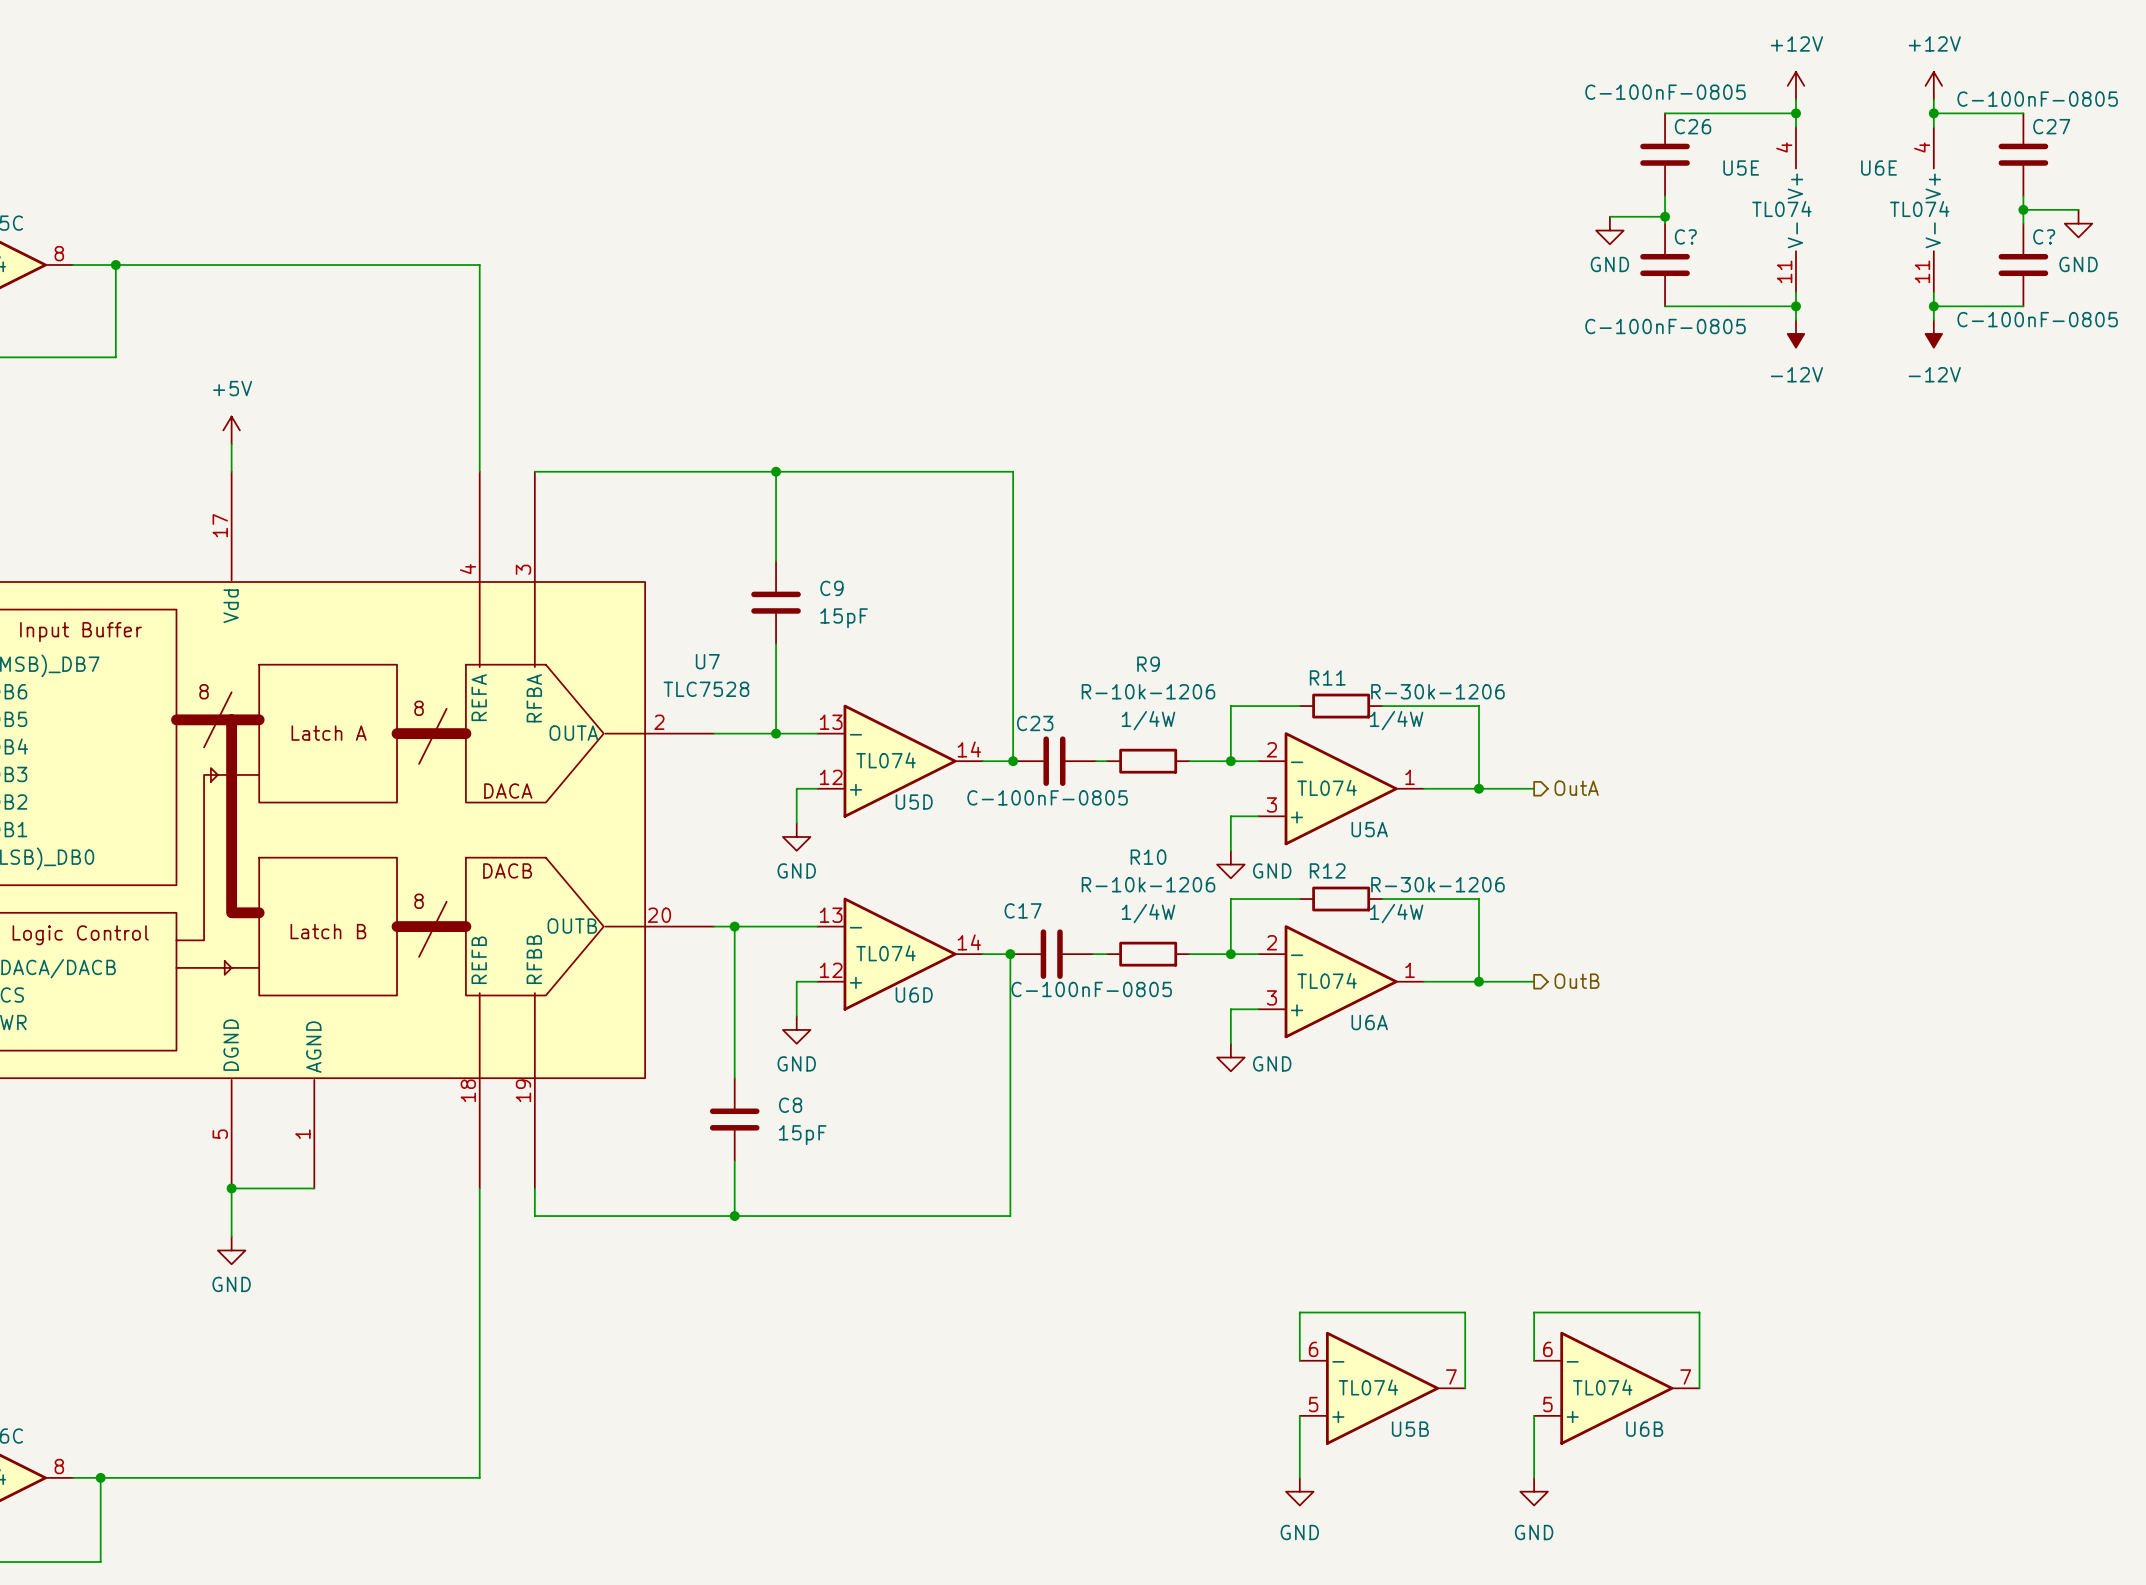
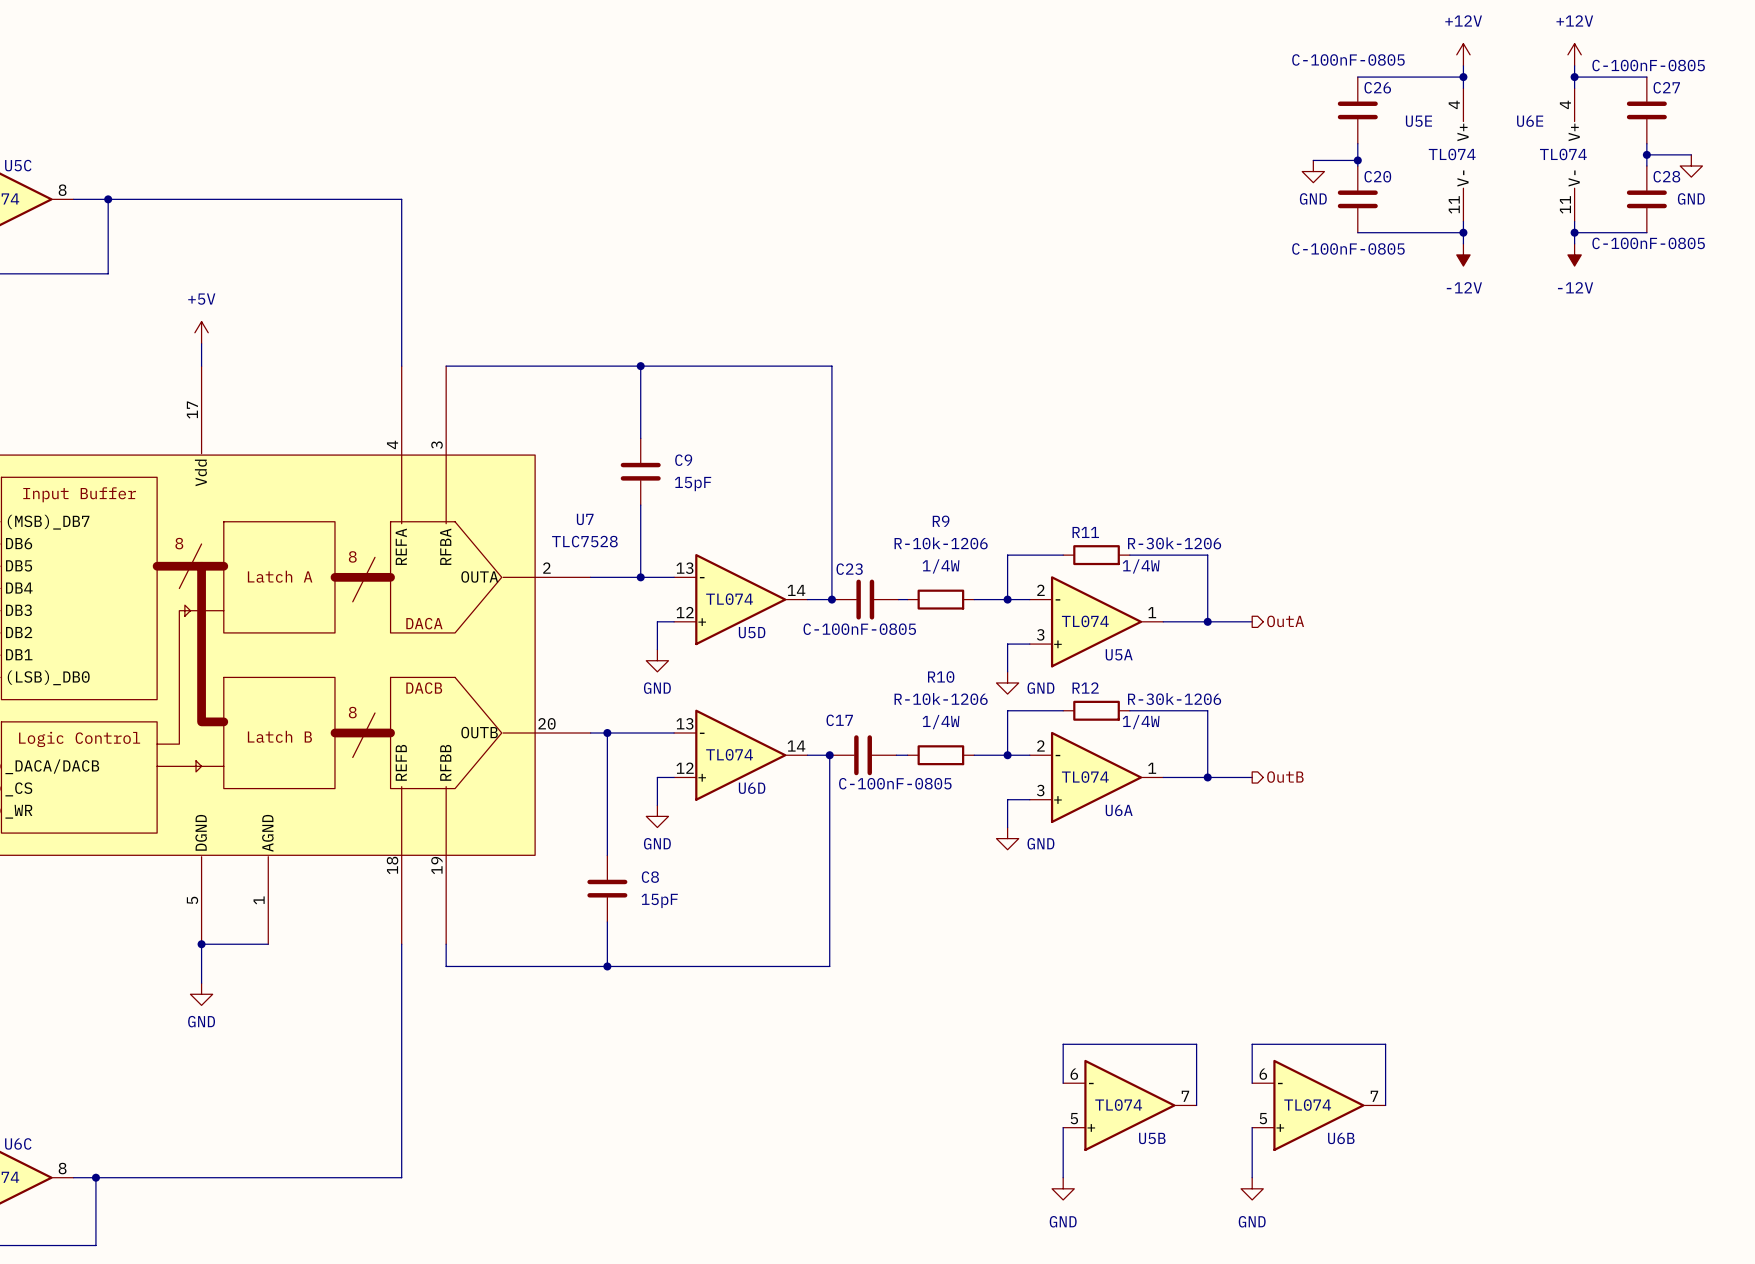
C? name: C? (1685, 236) -> C20 (1377, 176)
C? name: C? (2044, 236) -> C28 (1666, 176)

